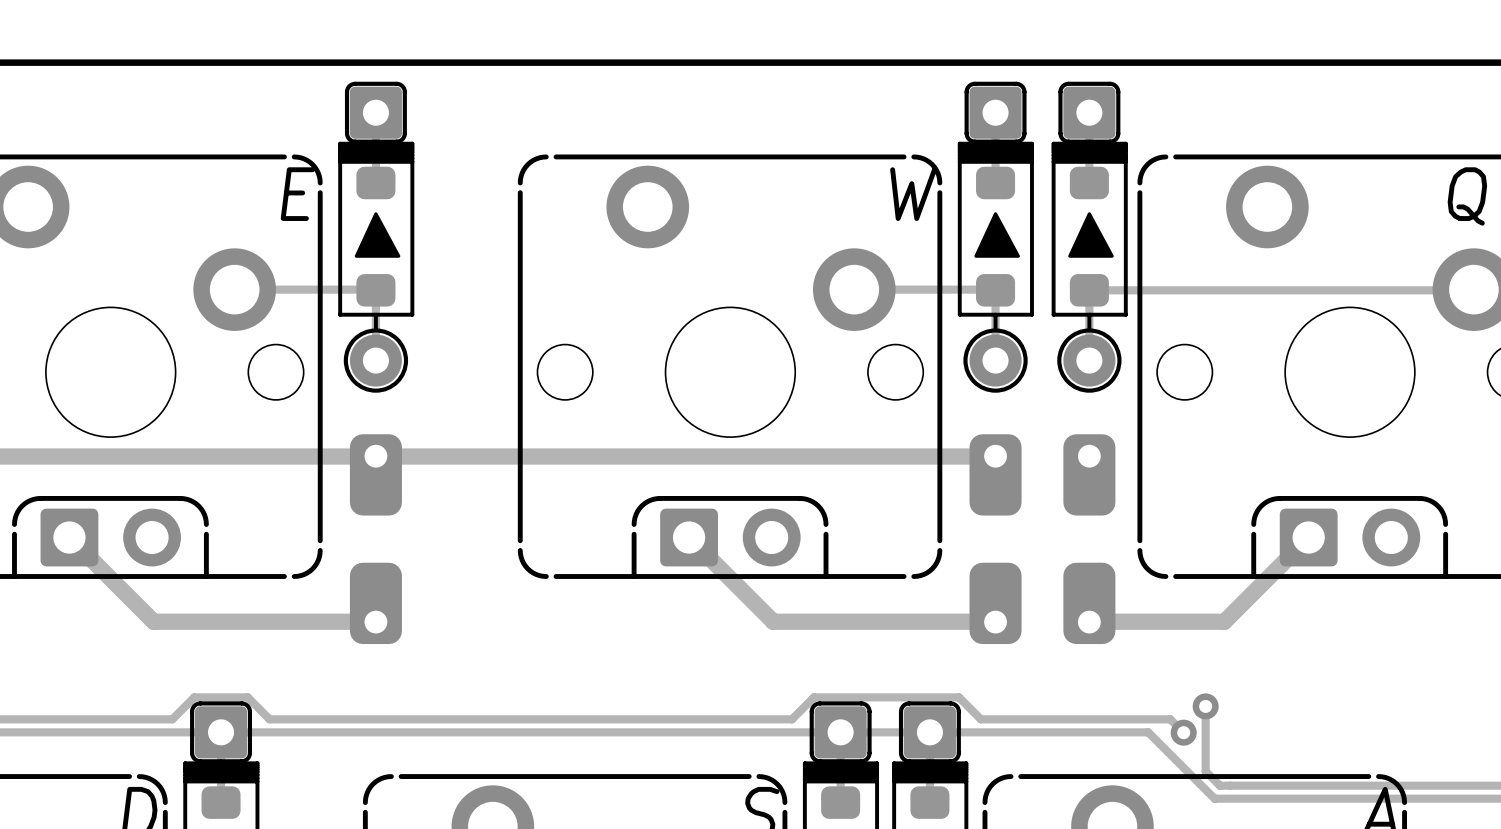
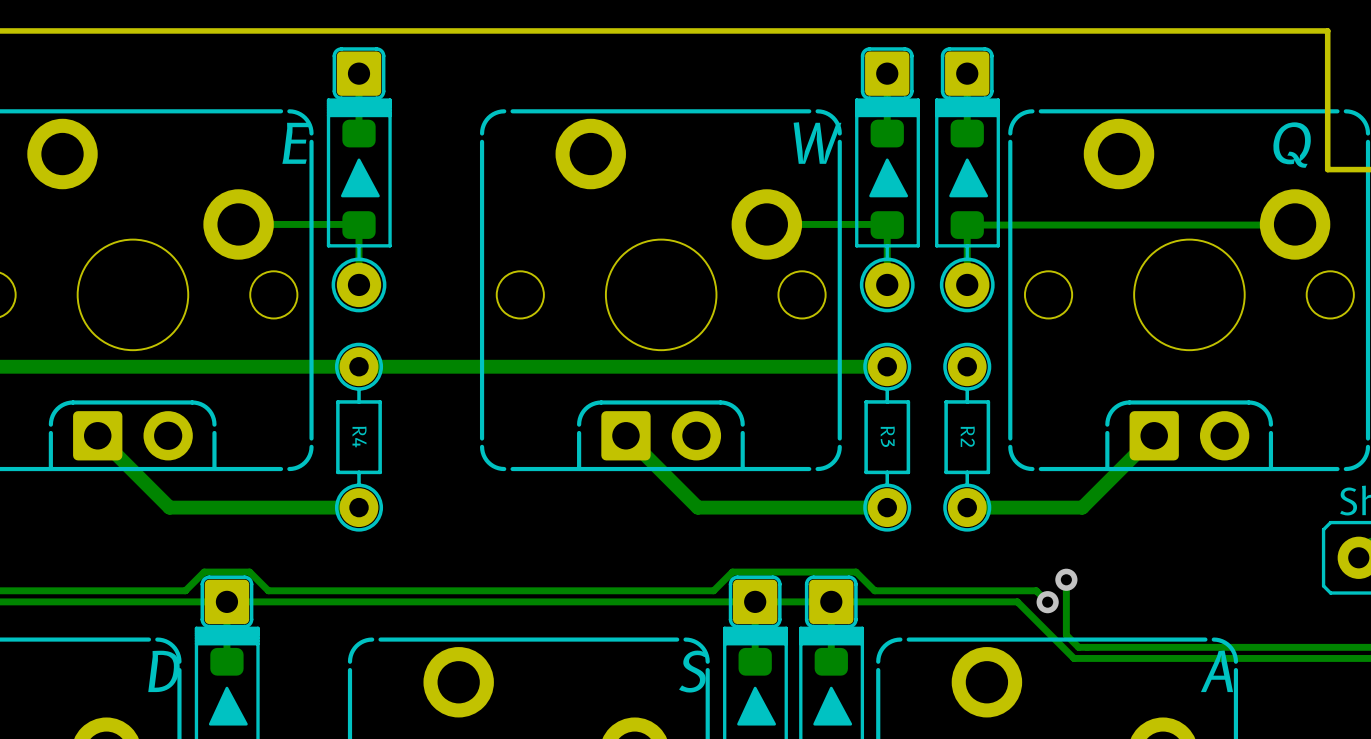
part: (375, 539) -> none
R4: none -> (359, 437)
part: (995, 539) -> none
R3: none -> (887, 437)
part: (1089, 539) -> none
R2: none -> (967, 437)

